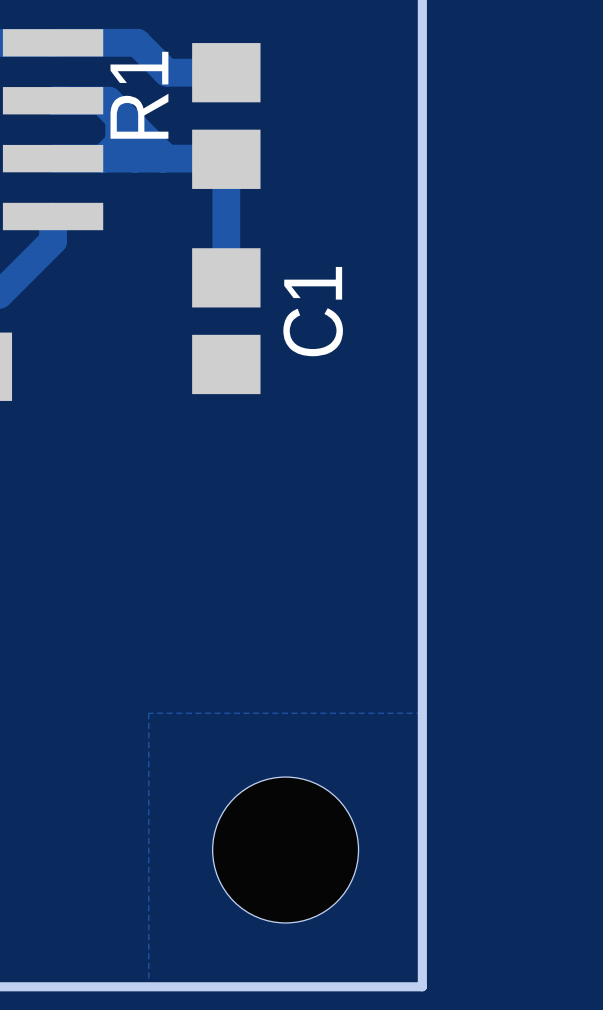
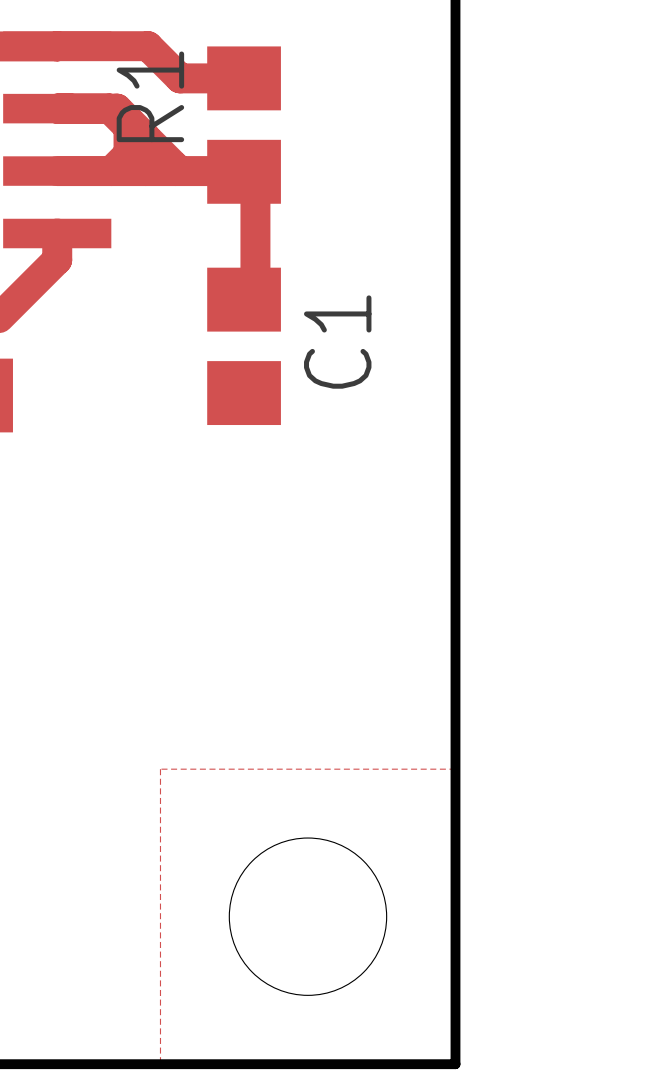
track: (230, 163) (226, 159) (226, 277) -> none
track: none -> (255, 186) (255, 291)

